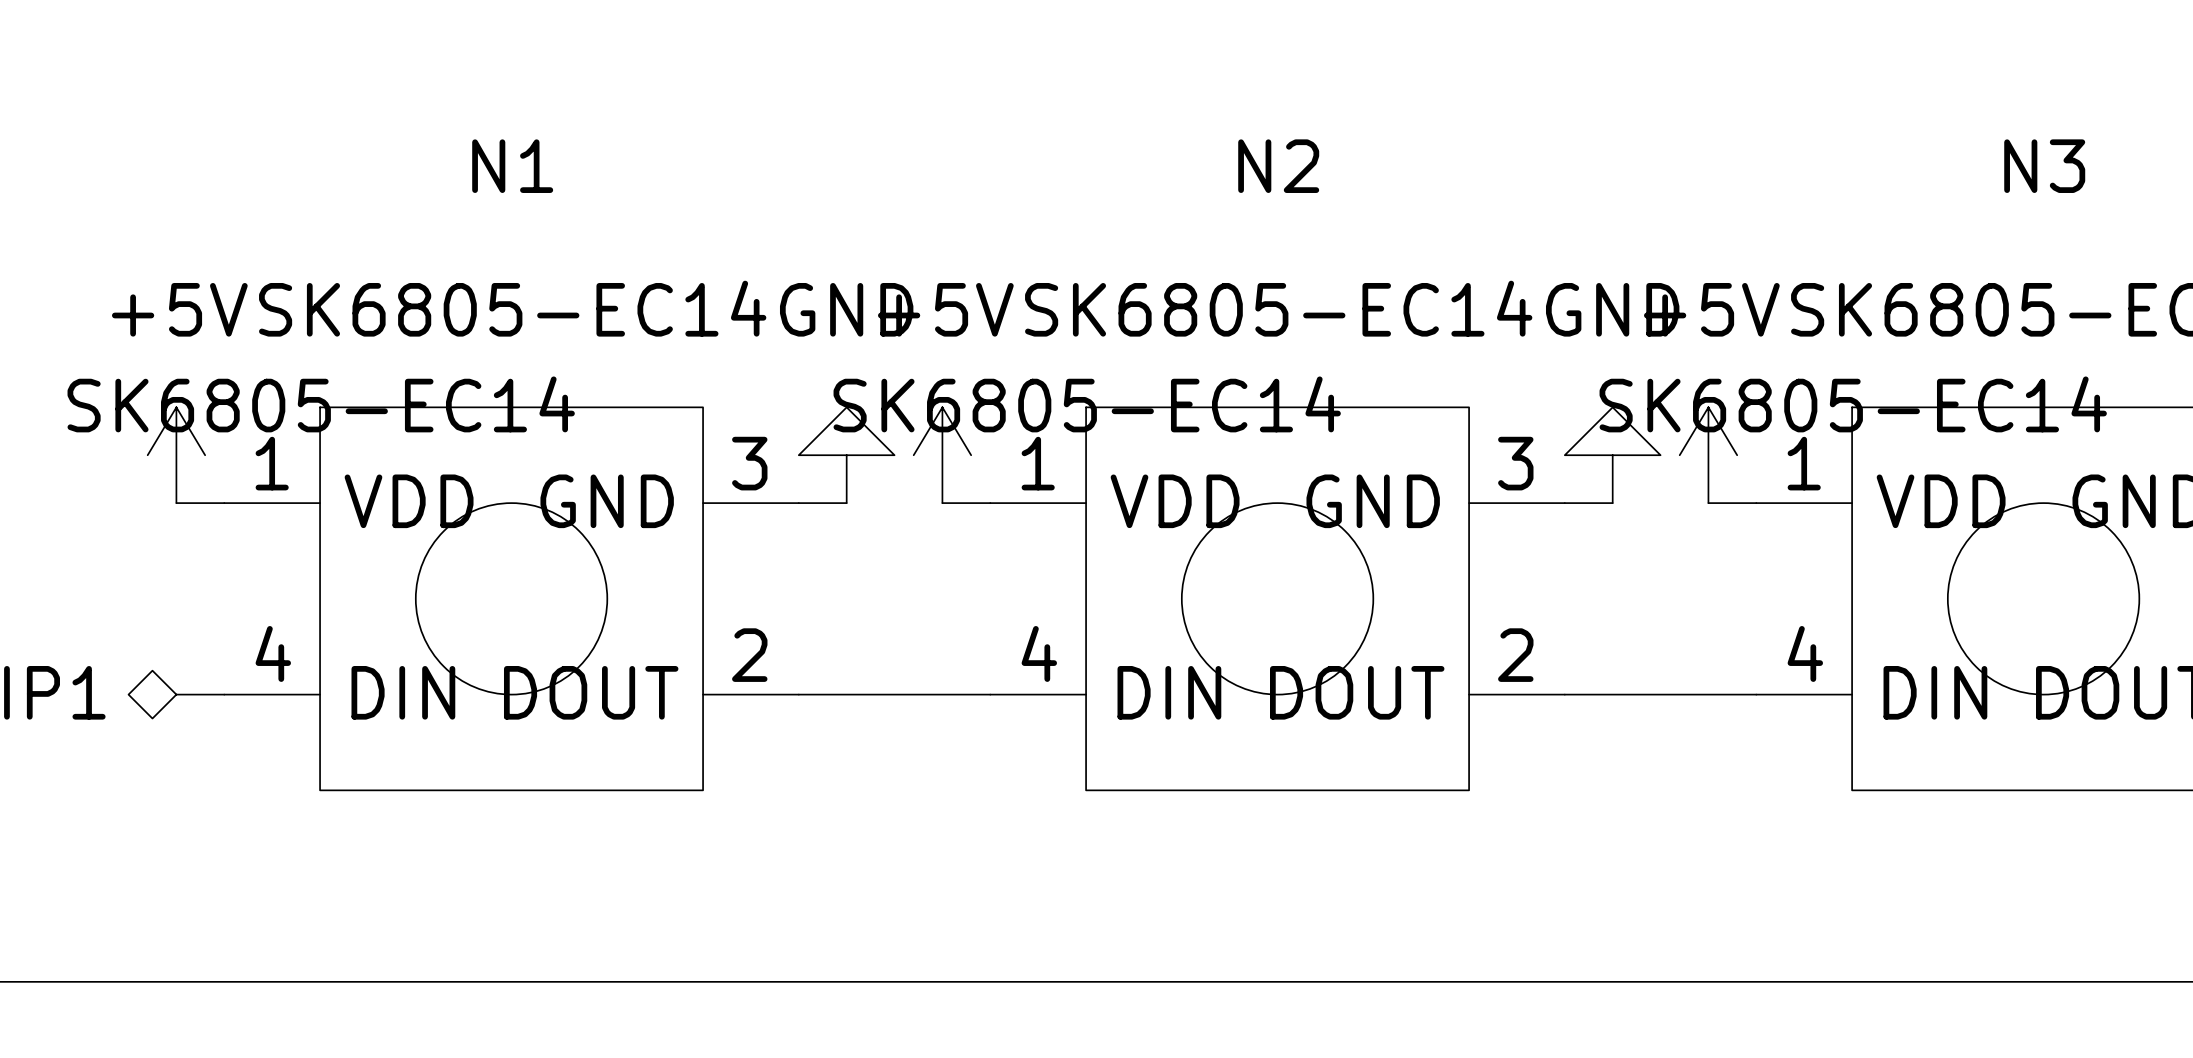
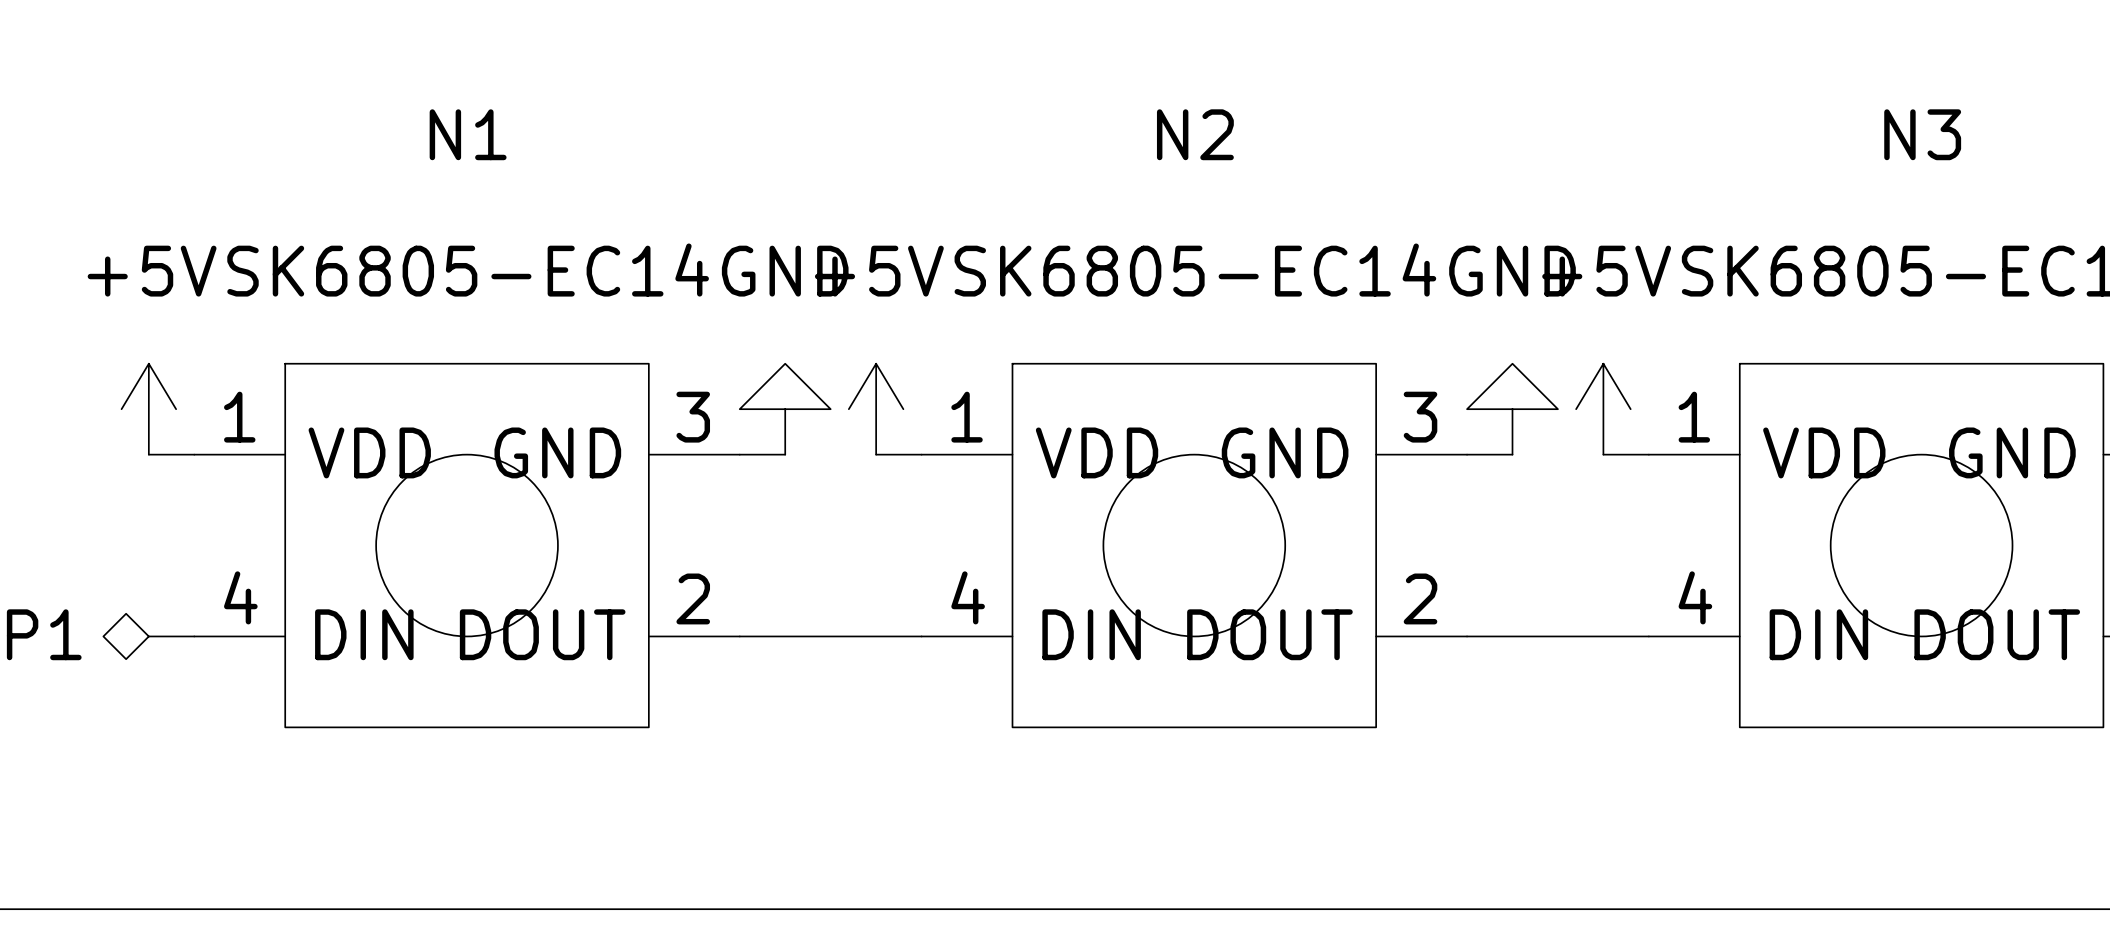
N1 value: SK6805-EC14 (321, 404) -> none
N2 value: SK6805-EC14 (1087, 404) -> none
N3 value: SK6805-EC14 (1853, 404) -> none

